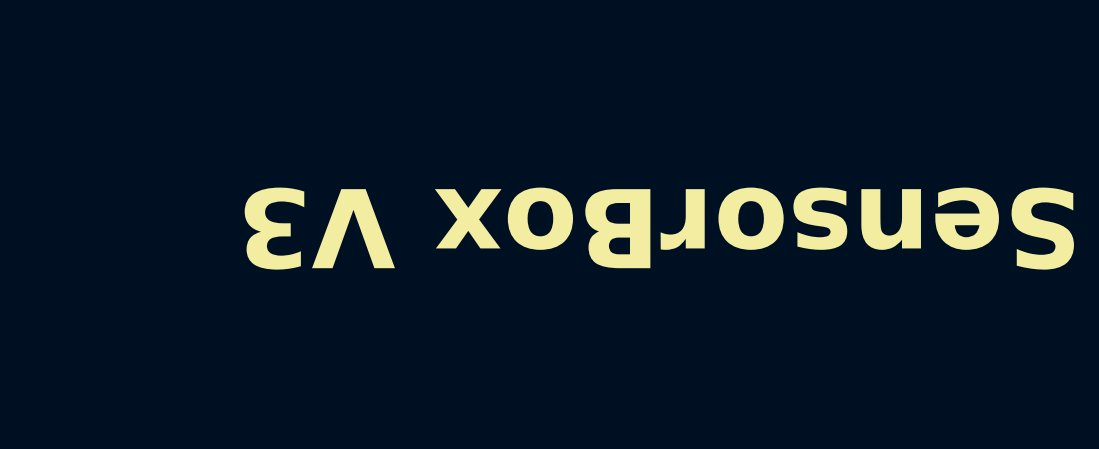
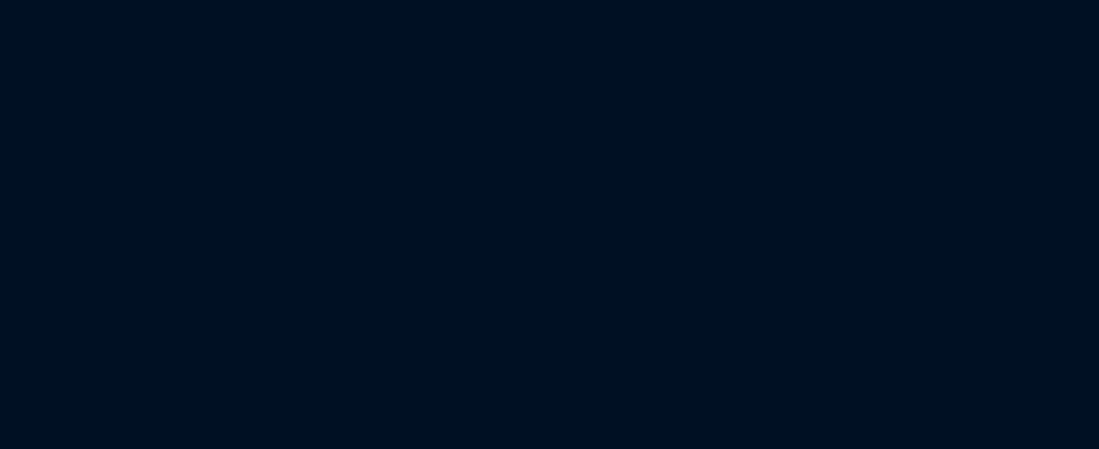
text: SensorBox V3 (659, 228) -> none

